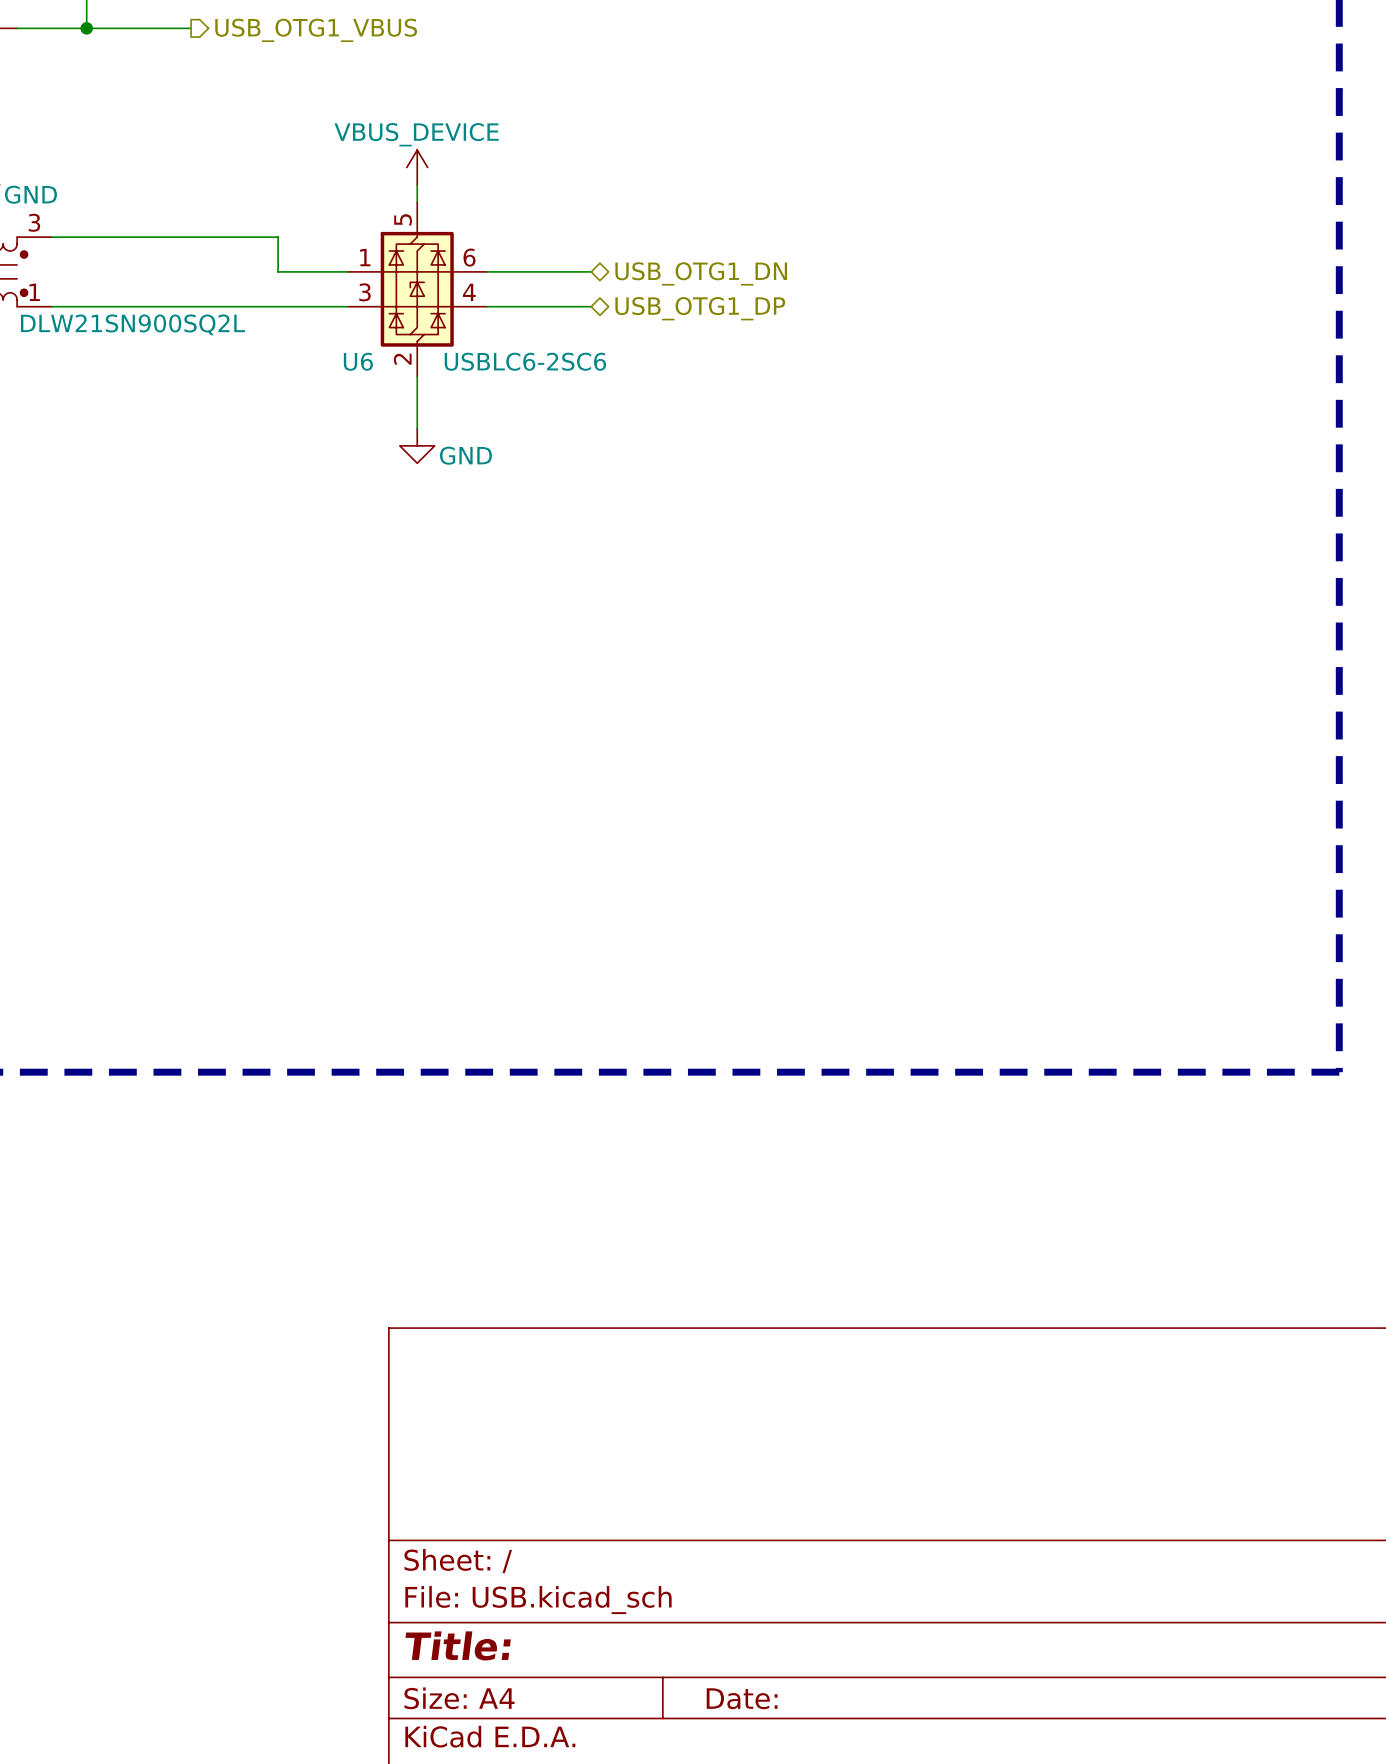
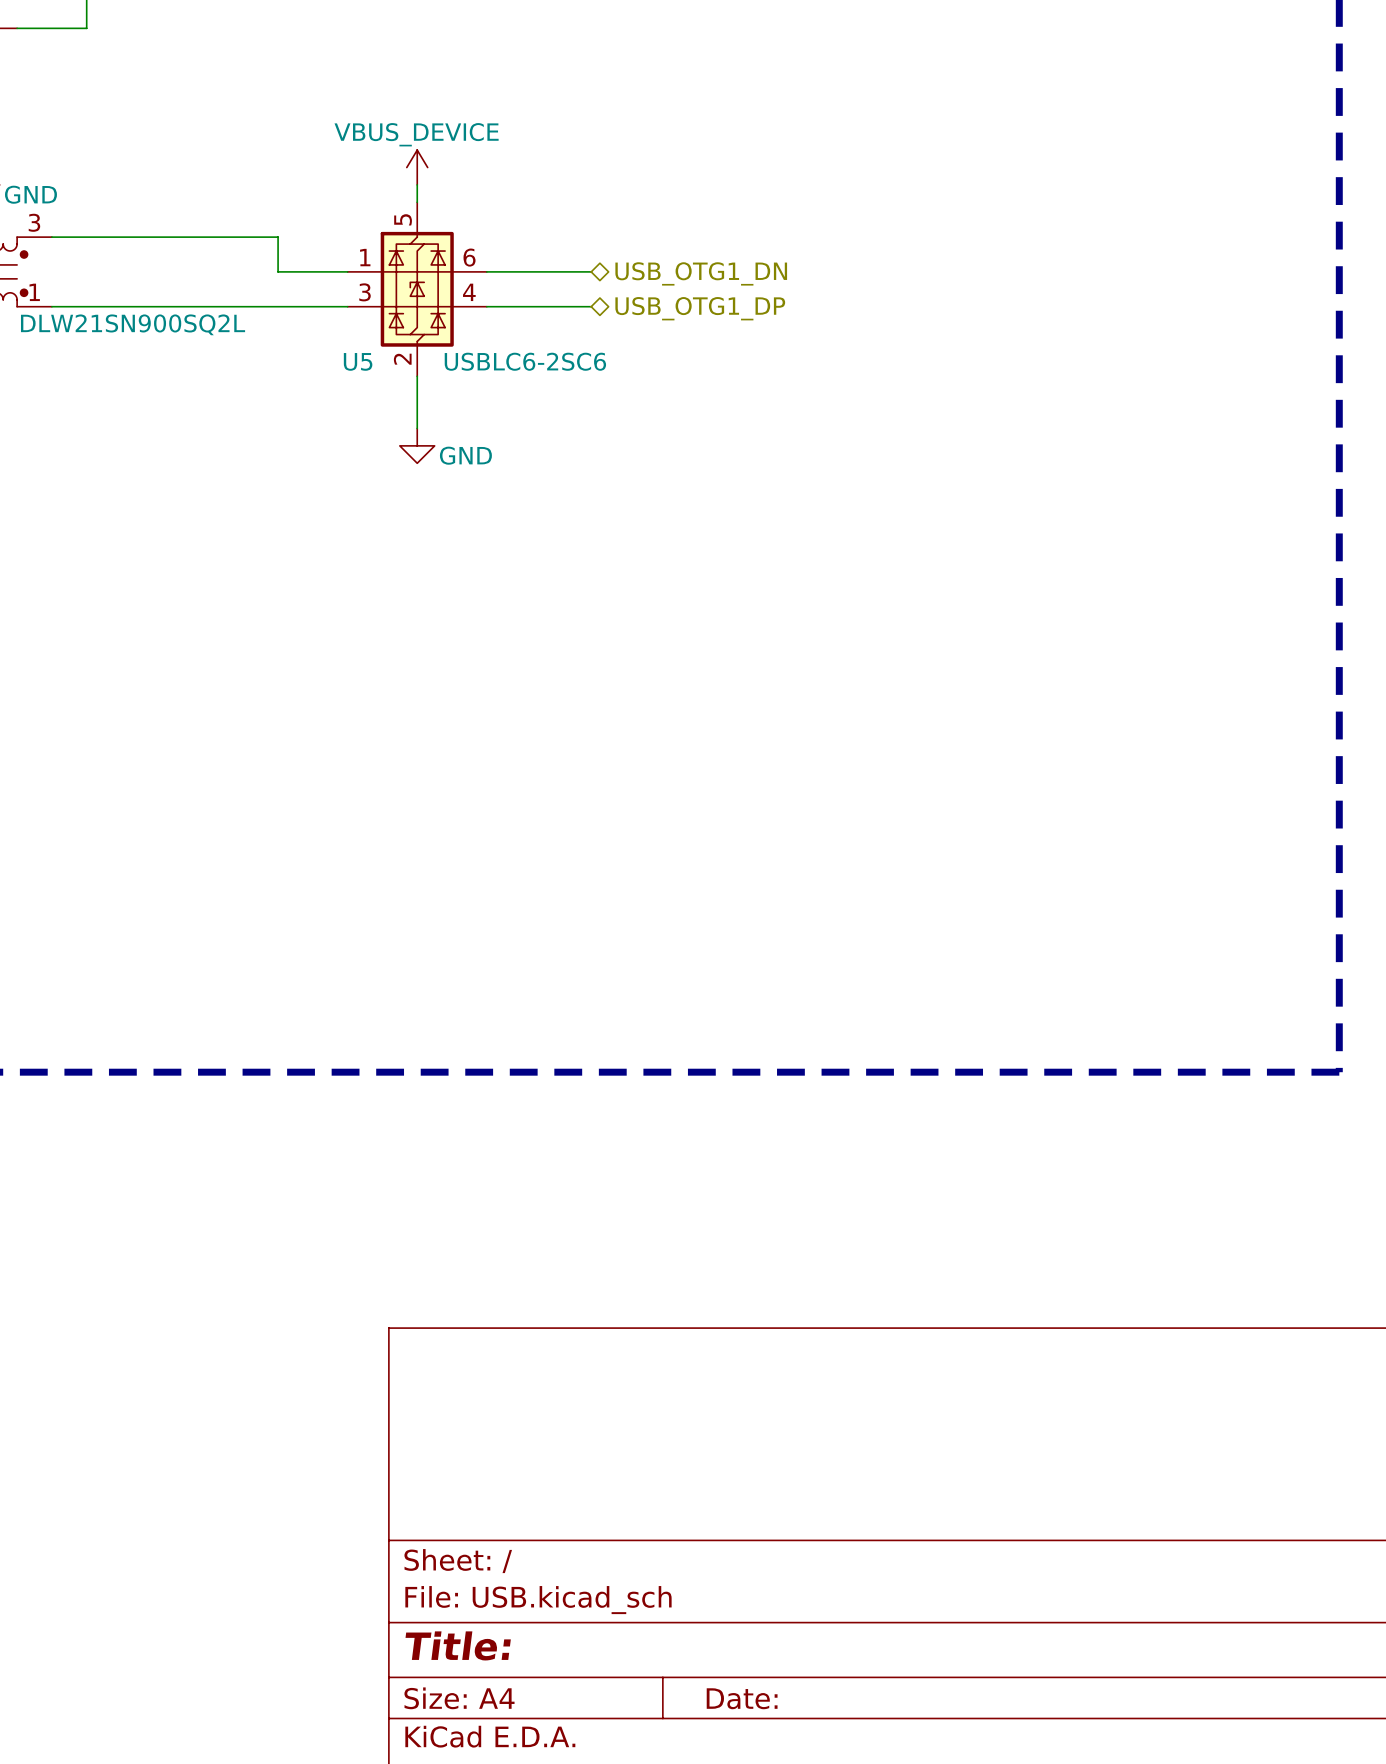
wire: (86, 28) (191, 28) -> none
junction: (86, 28) -> none
hierarchical label: USB_OTG1_VBUS (316, 30) -> none
U6 name: U6 (358, 361) -> U5 (358, 361)

